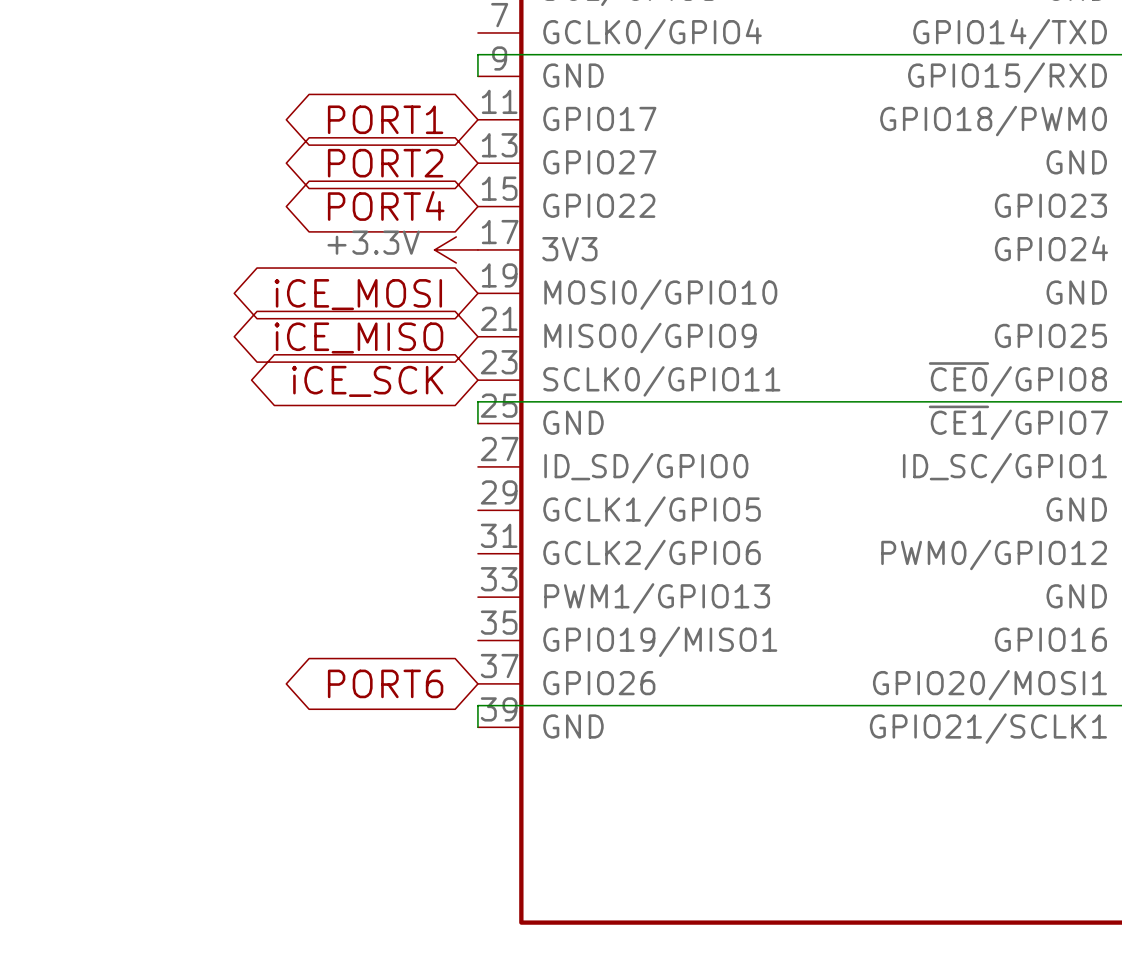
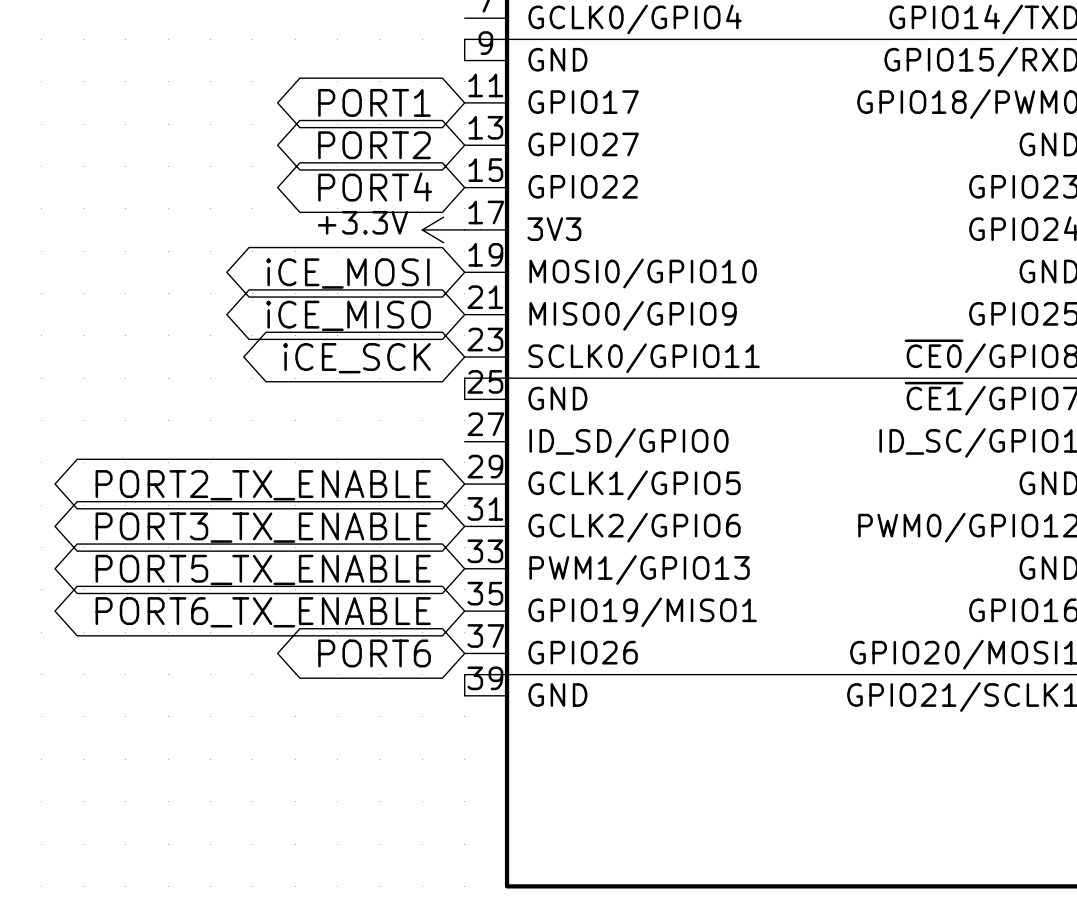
global label: none -> PORT2_TX_ENABLE (263, 485)
global label: none -> PORT3_TX_ENABLE (263, 527)
global label: none -> PORT5_TX_ENABLE (263, 569)
global label: none -> PORT6_TX_ENABLE (263, 612)

